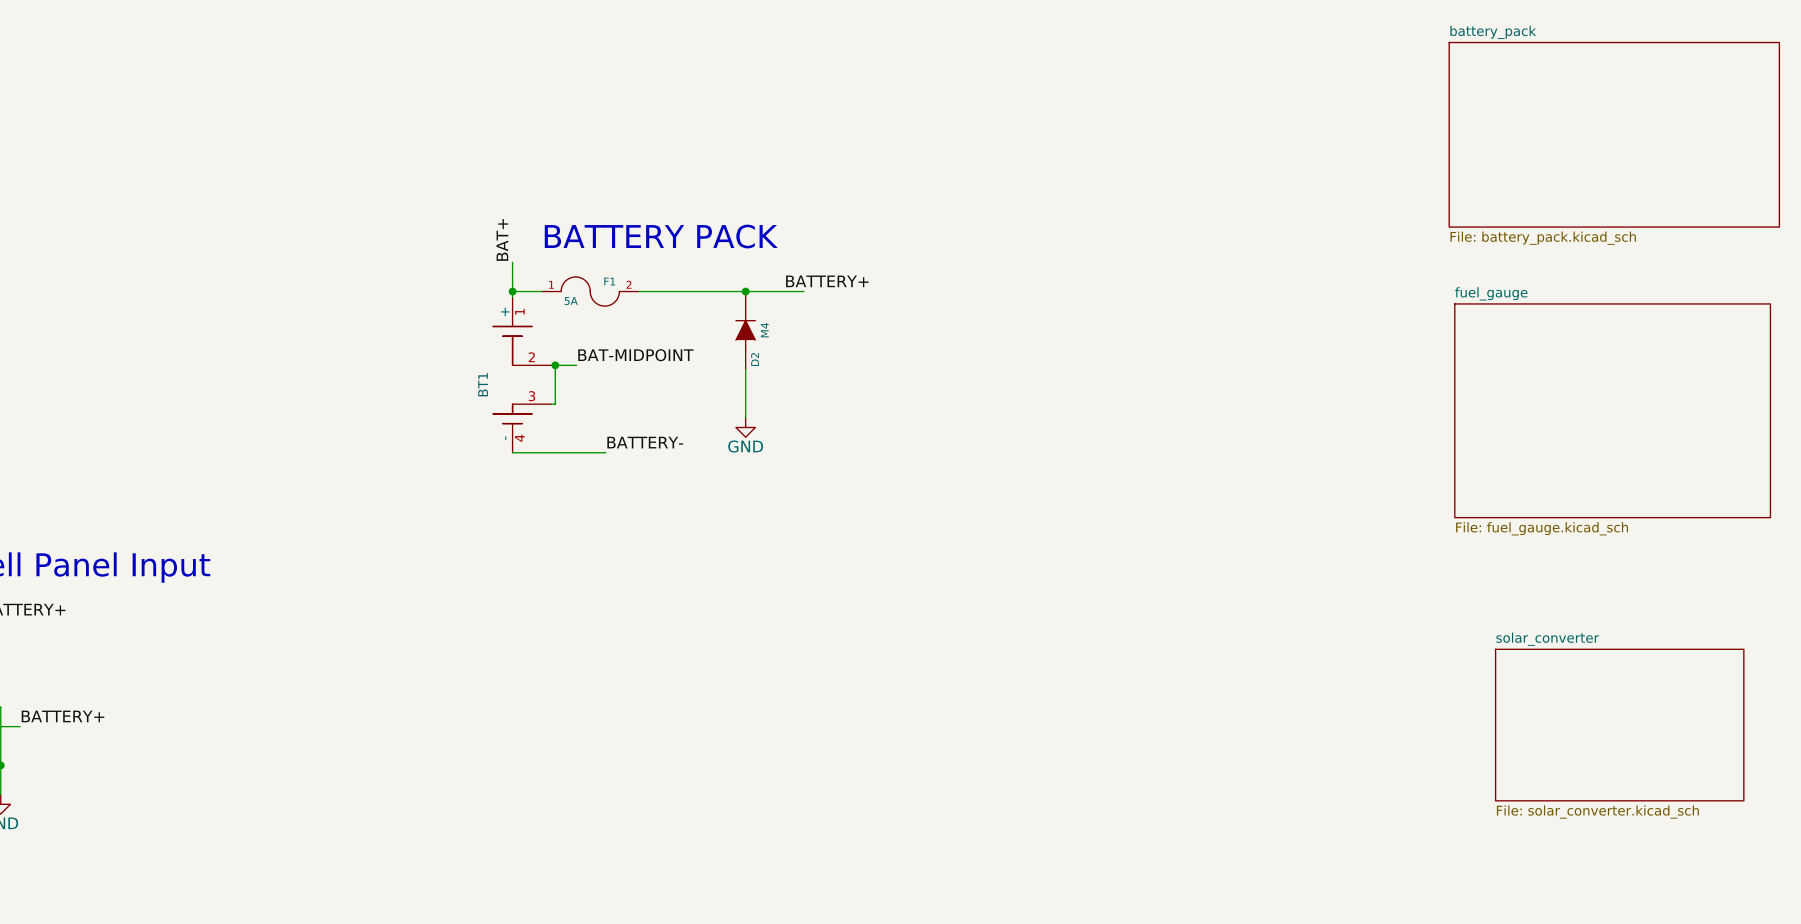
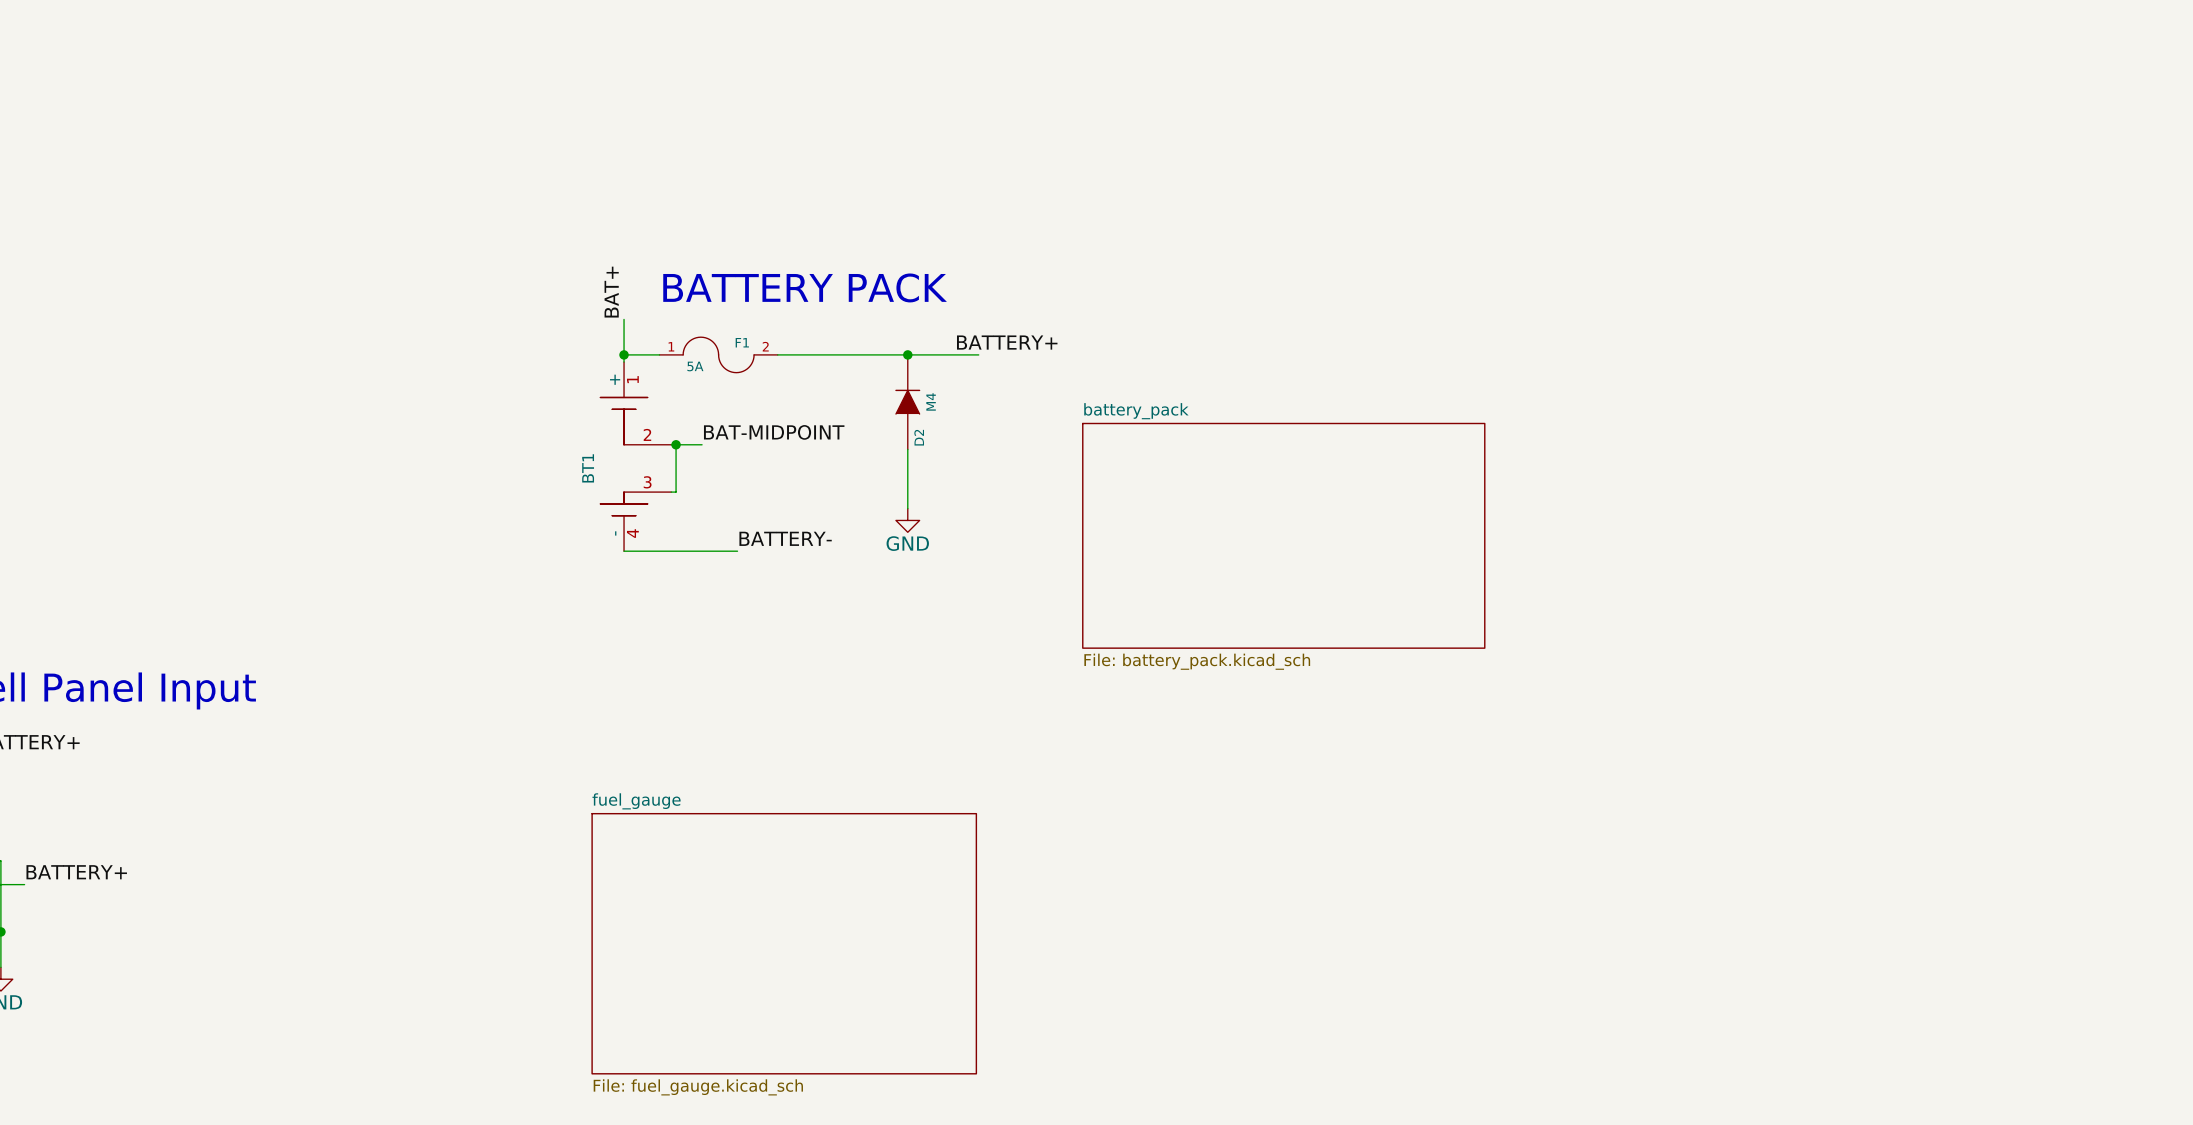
sheet battery_pack: File: battery_pack.kicad_sch (1614, 134) -> none
sheet fuel_gauge: File: fuel_gauge.kicad_sch (1612, 410) -> none
sheet battery_pack: none -> File: battery_pack.kicad_sch (1283, 535)
sheet solar_converter: File: solar_converter.kicad_sch (1619, 725) -> none
sheet fuel_gauge: none -> File: fuel_gauge.kicad_sch (784, 943)

